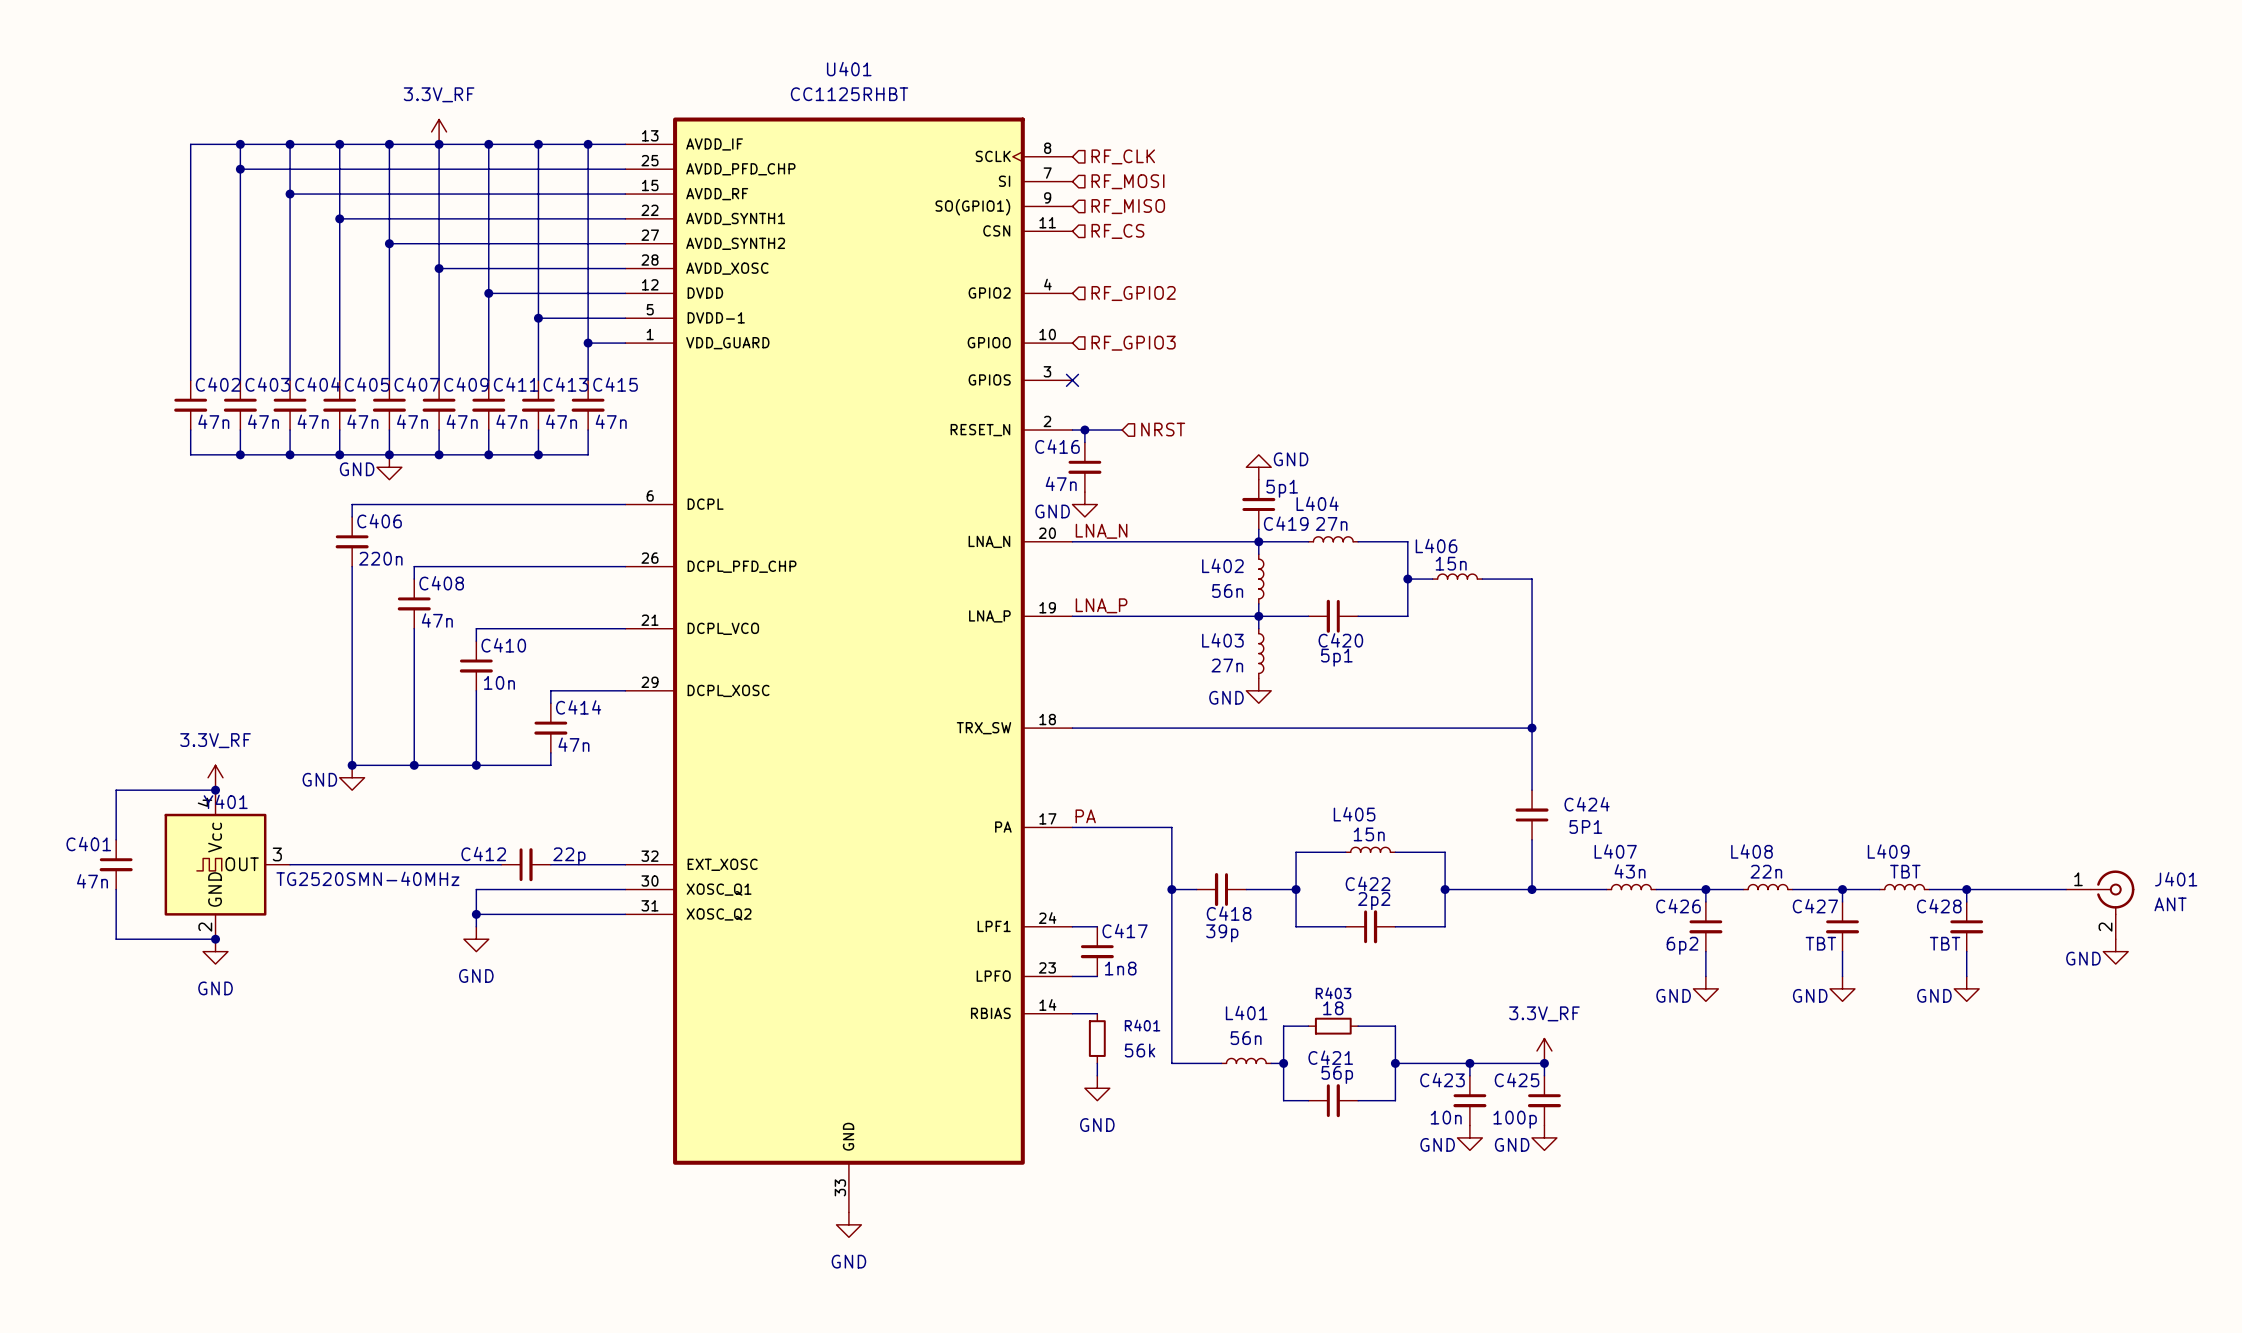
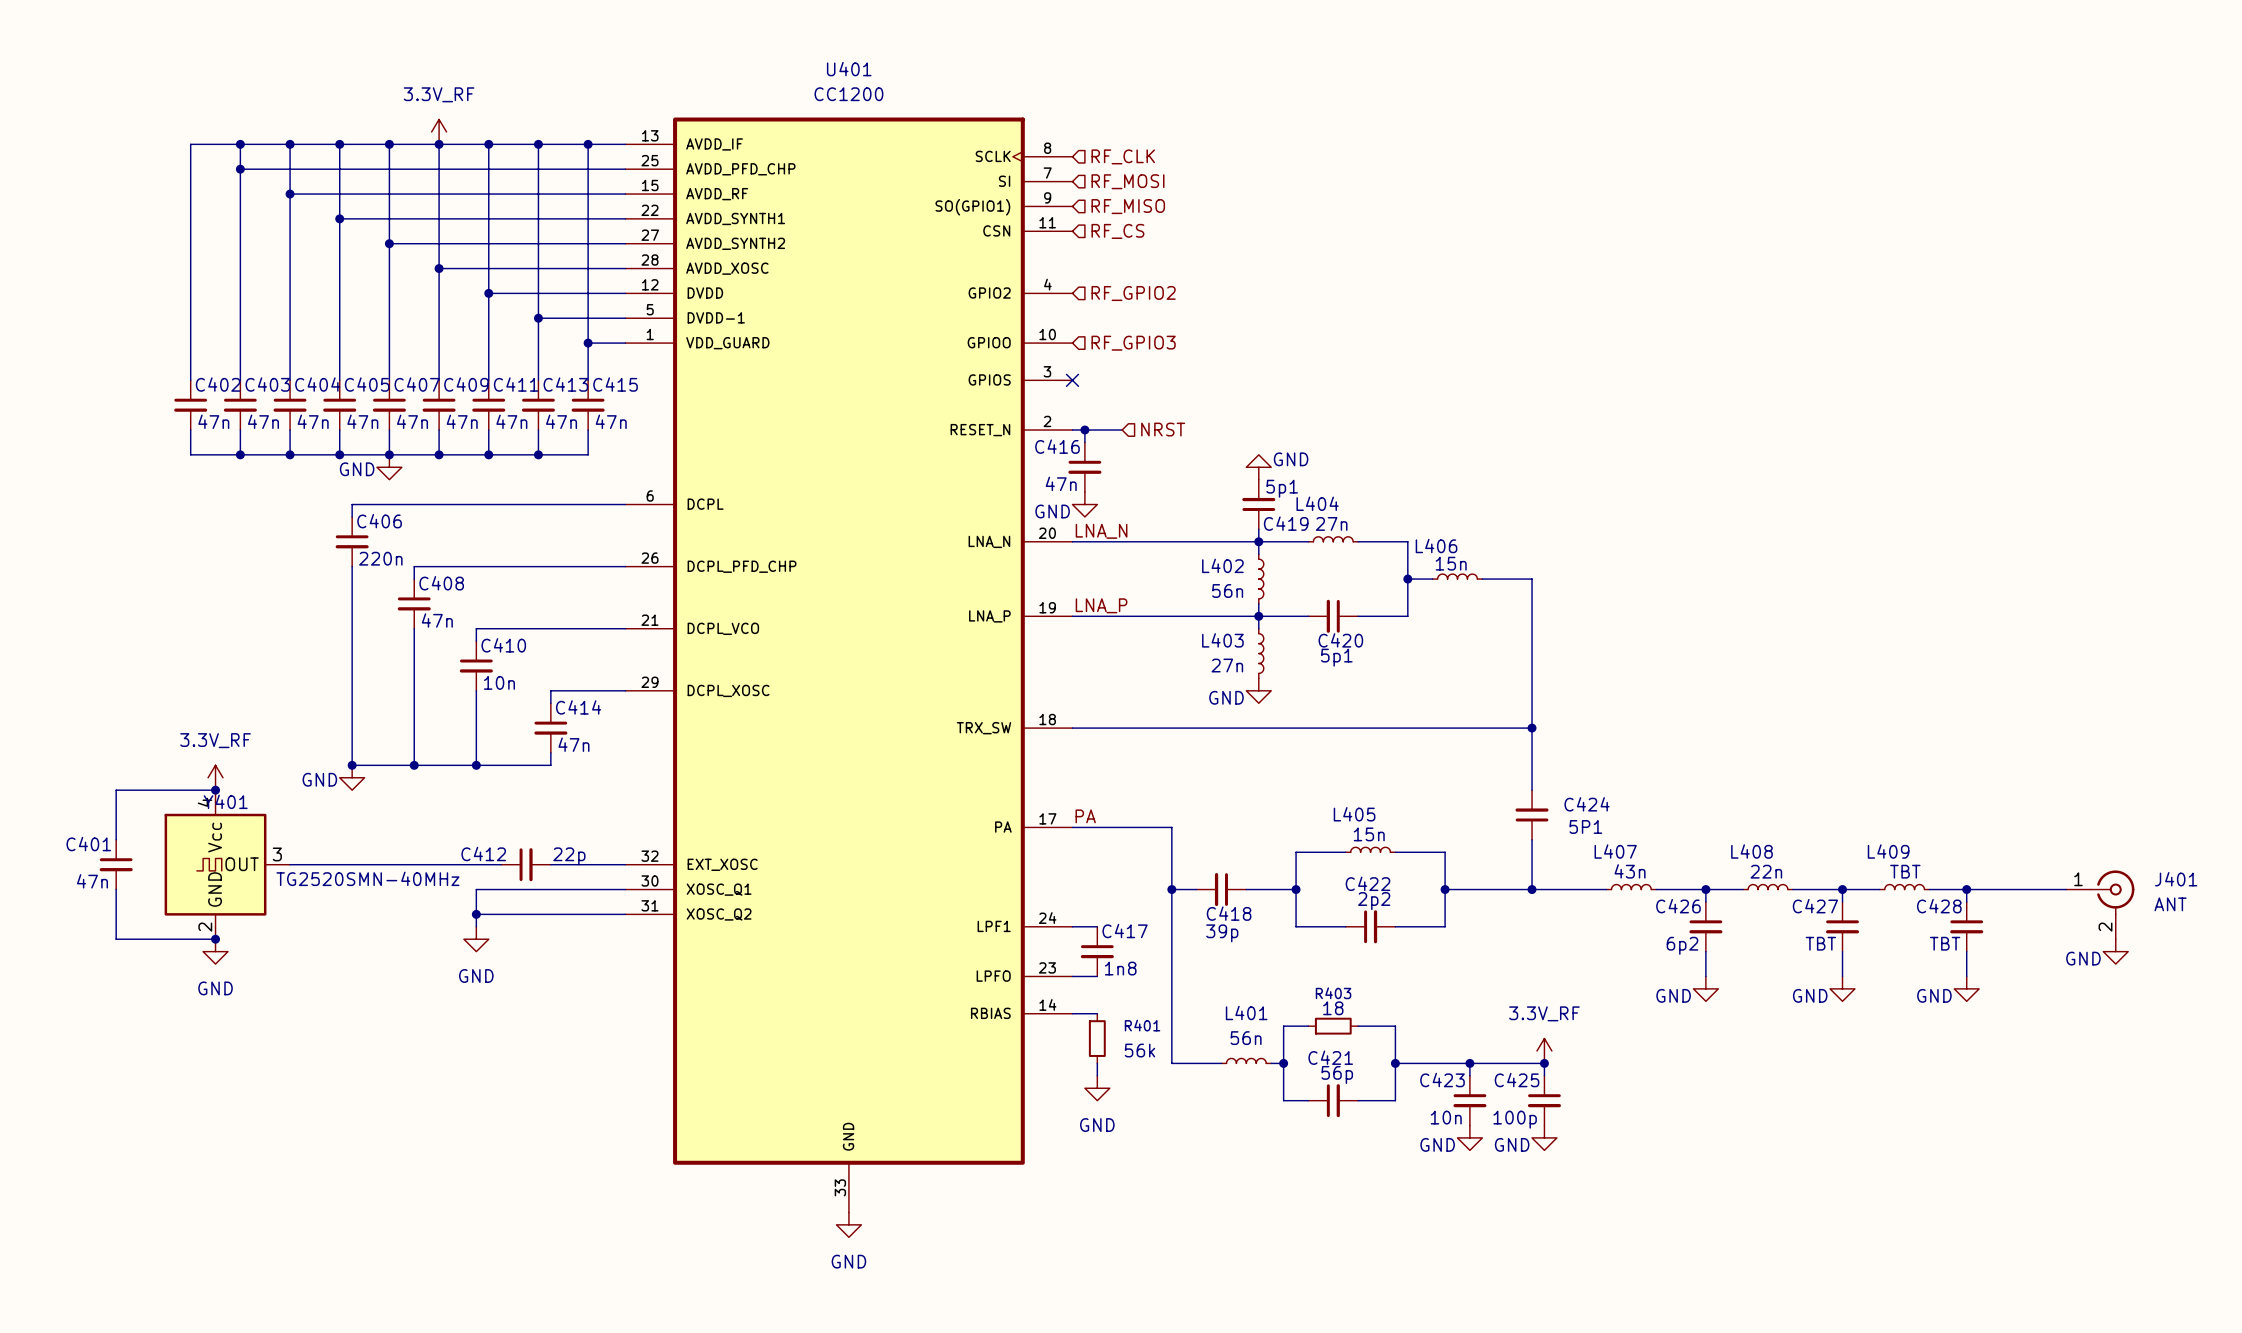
U401 value: CC1125RHBT (849, 94) -> CC1200 (848, 94)

